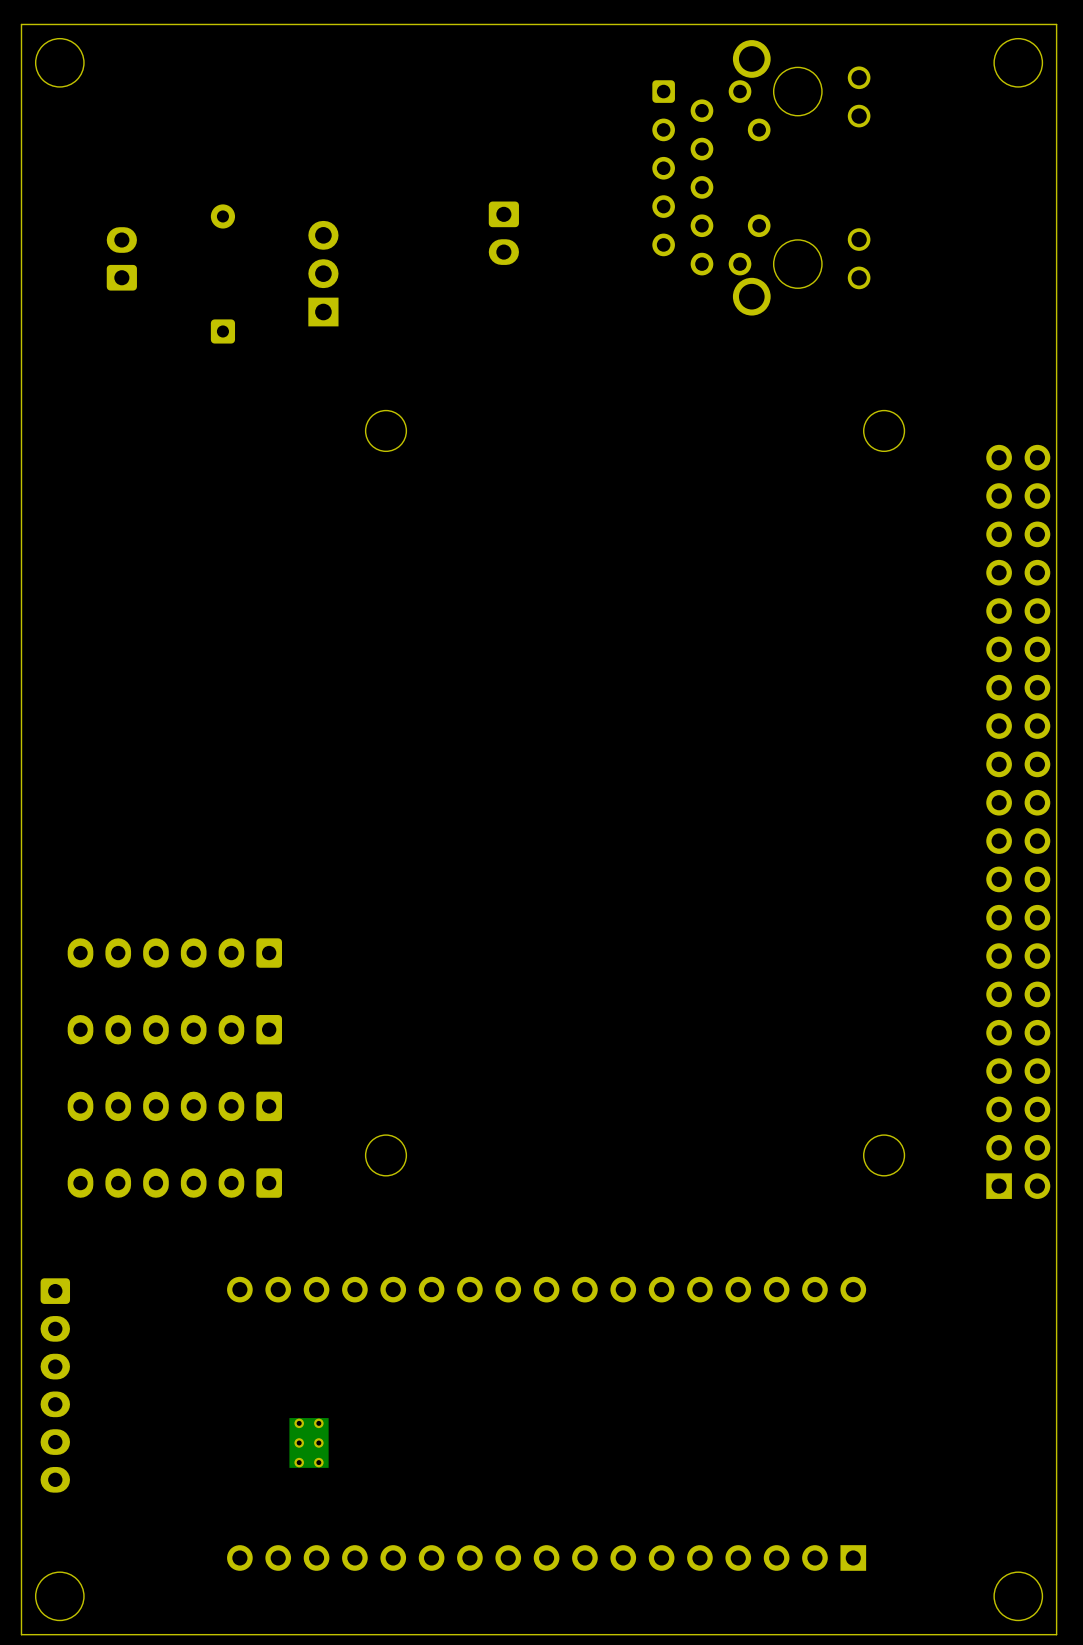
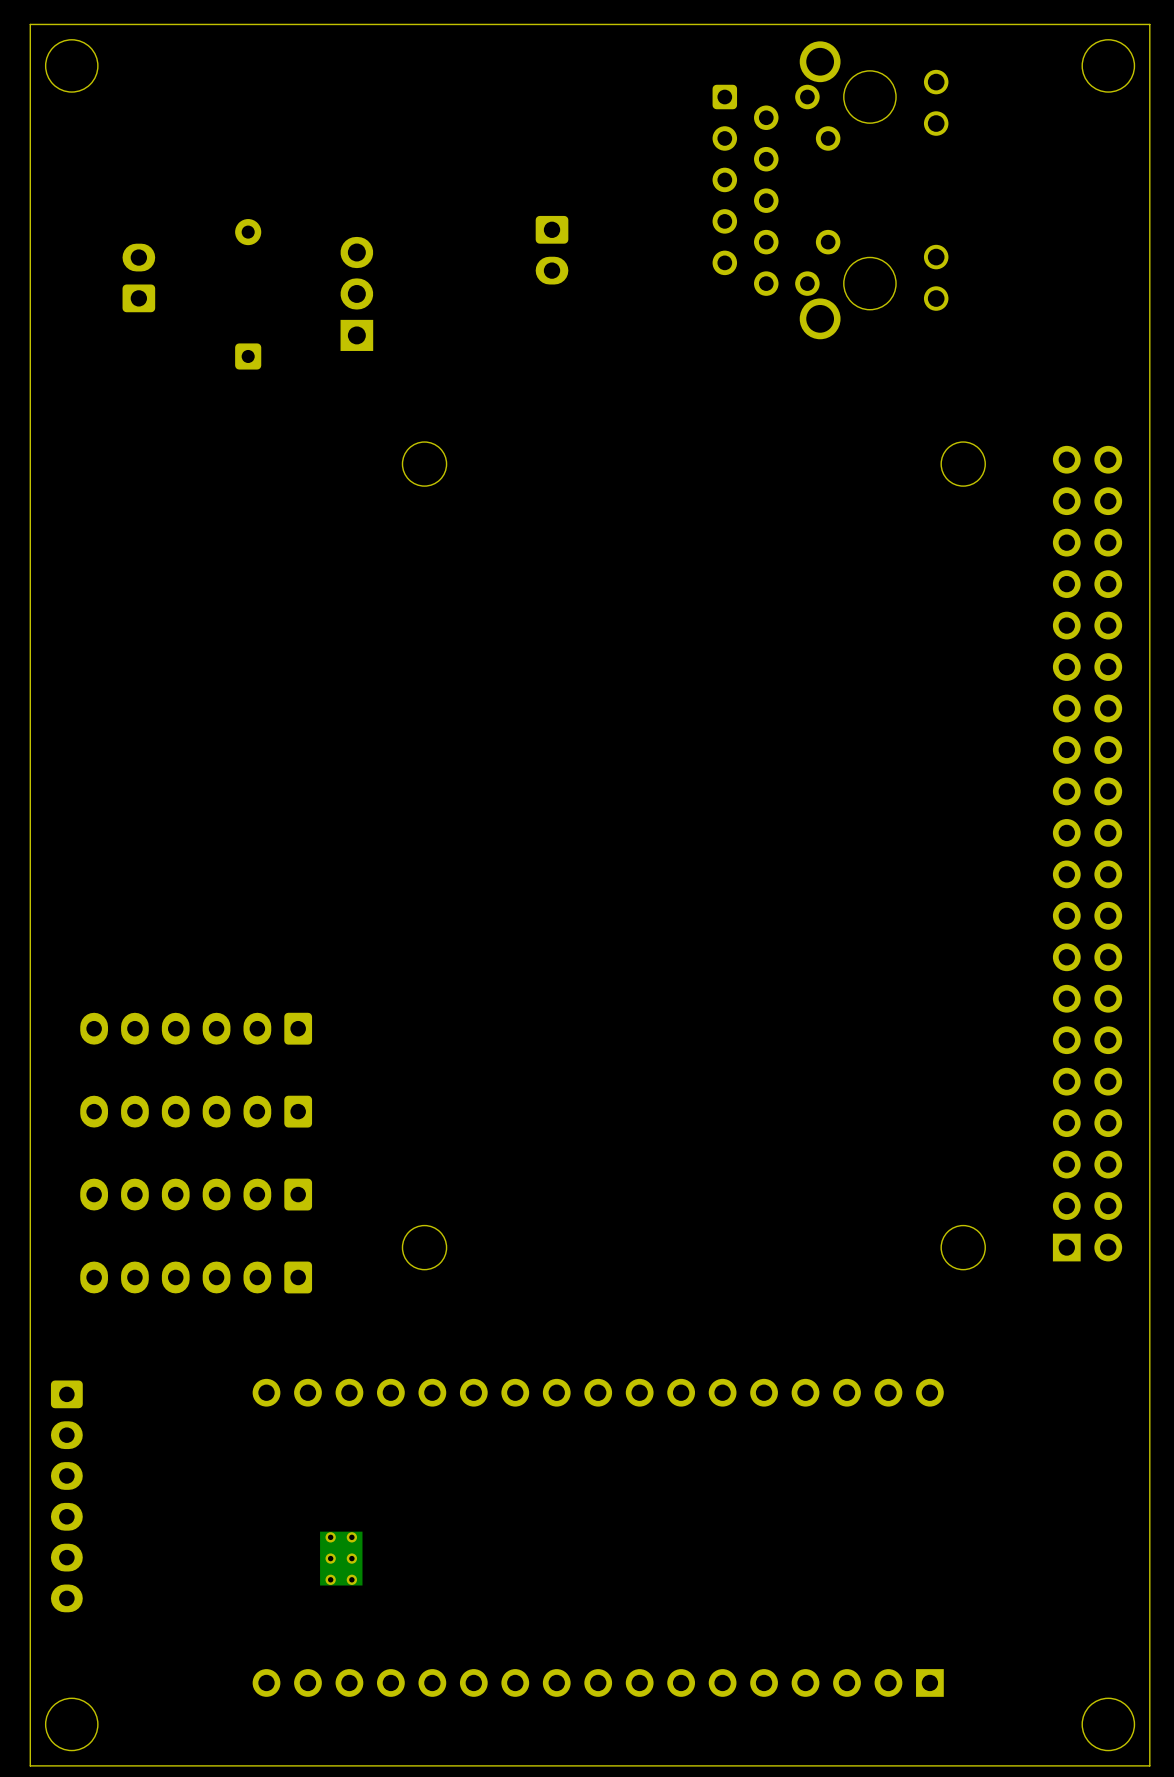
part position: (1018, 821) -> (1087, 853)

